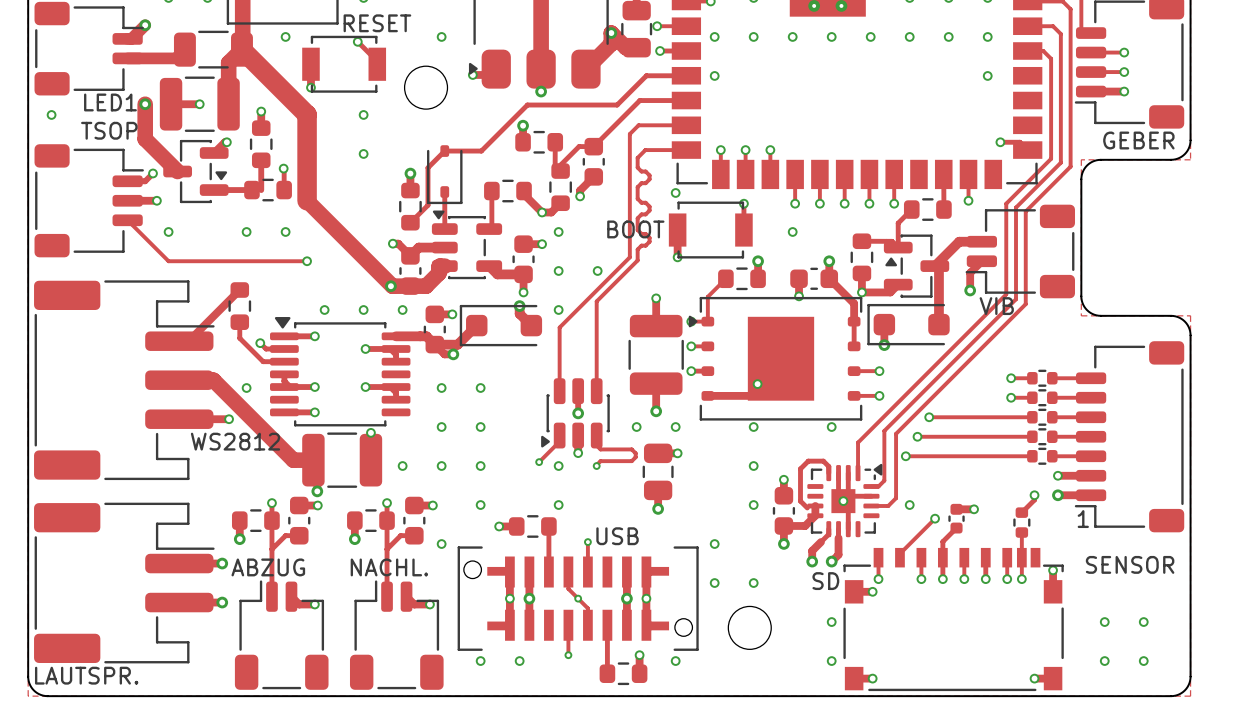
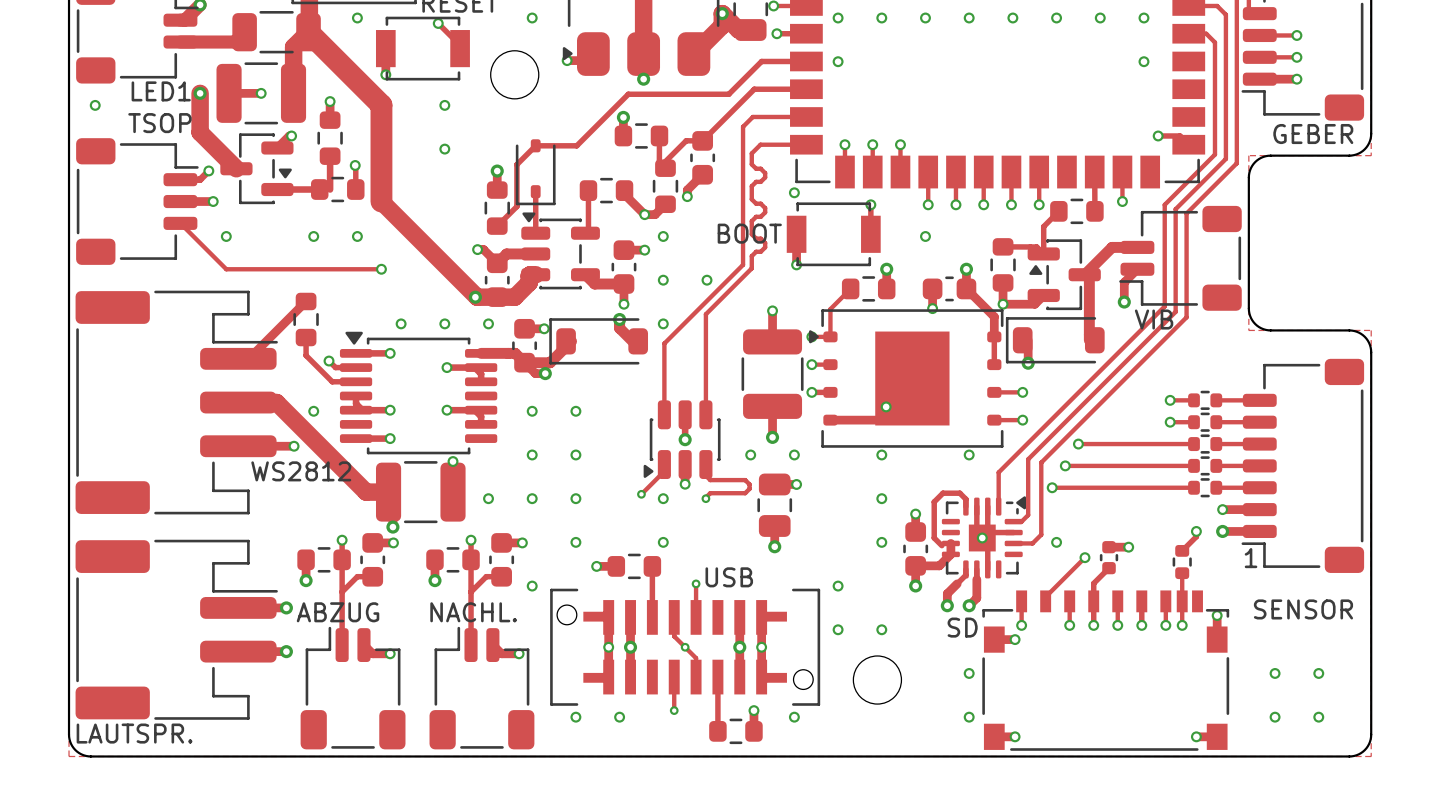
part footprint: [867, 303, 950, 346] -> [1005, 317, 1105, 364]
part footprint: [459, 304, 543, 347] -> [549, 318, 649, 365]

